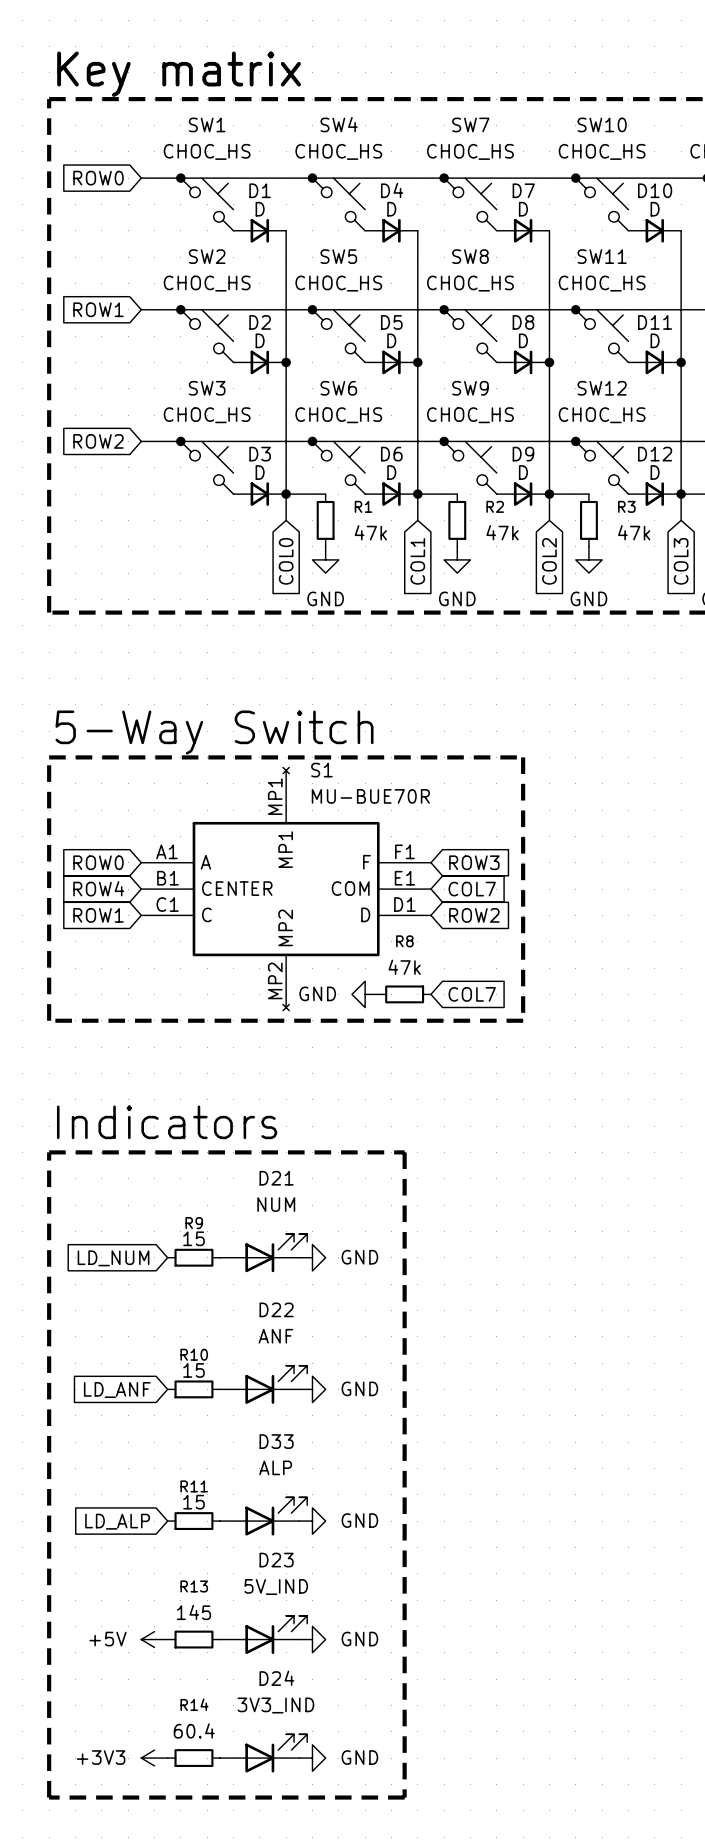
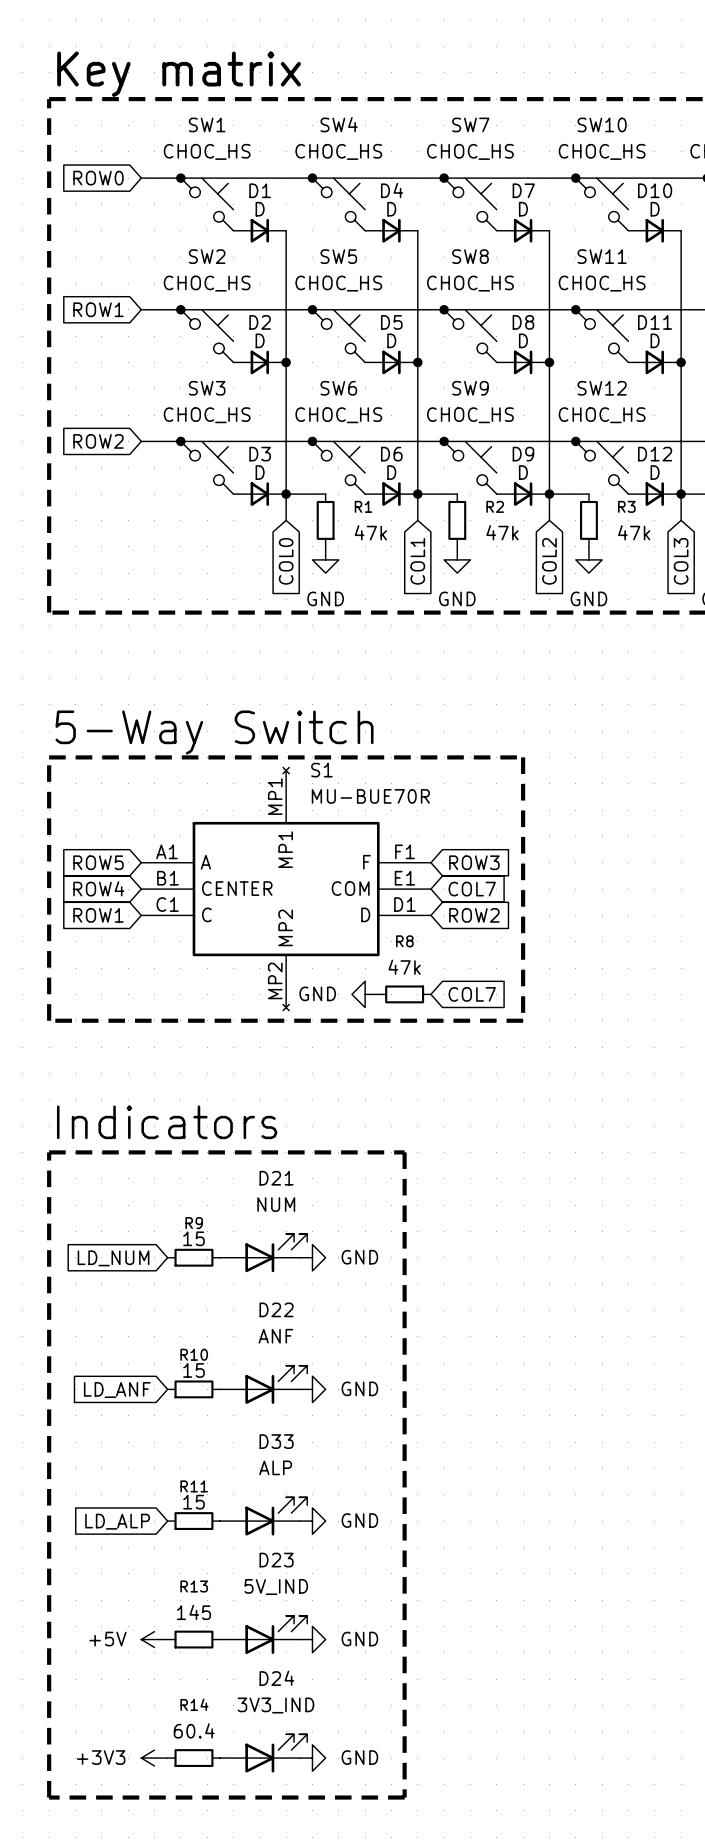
global label: ROW0 (98, 862) -> ROW5 (98, 862)

